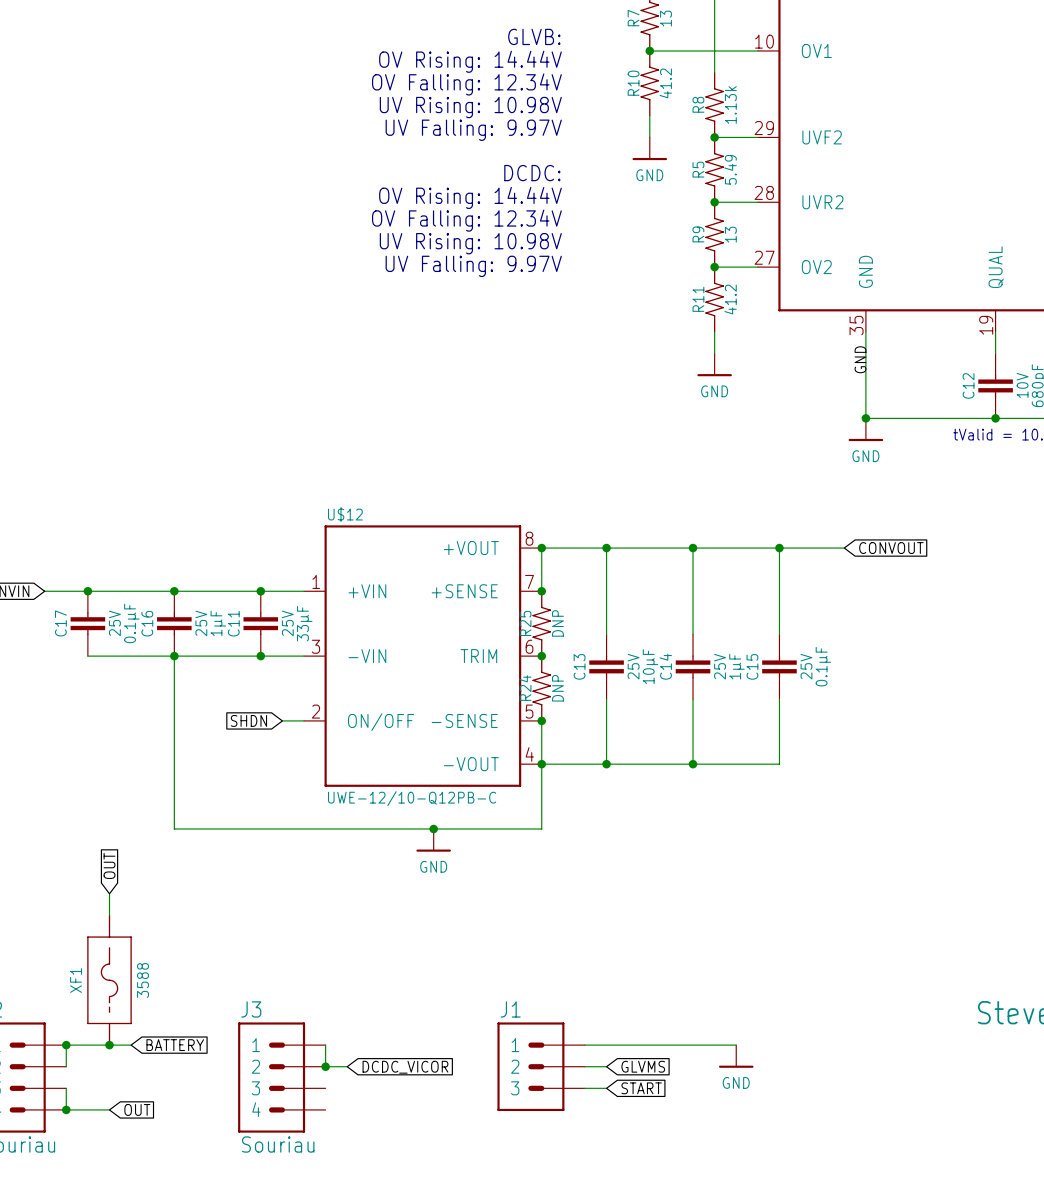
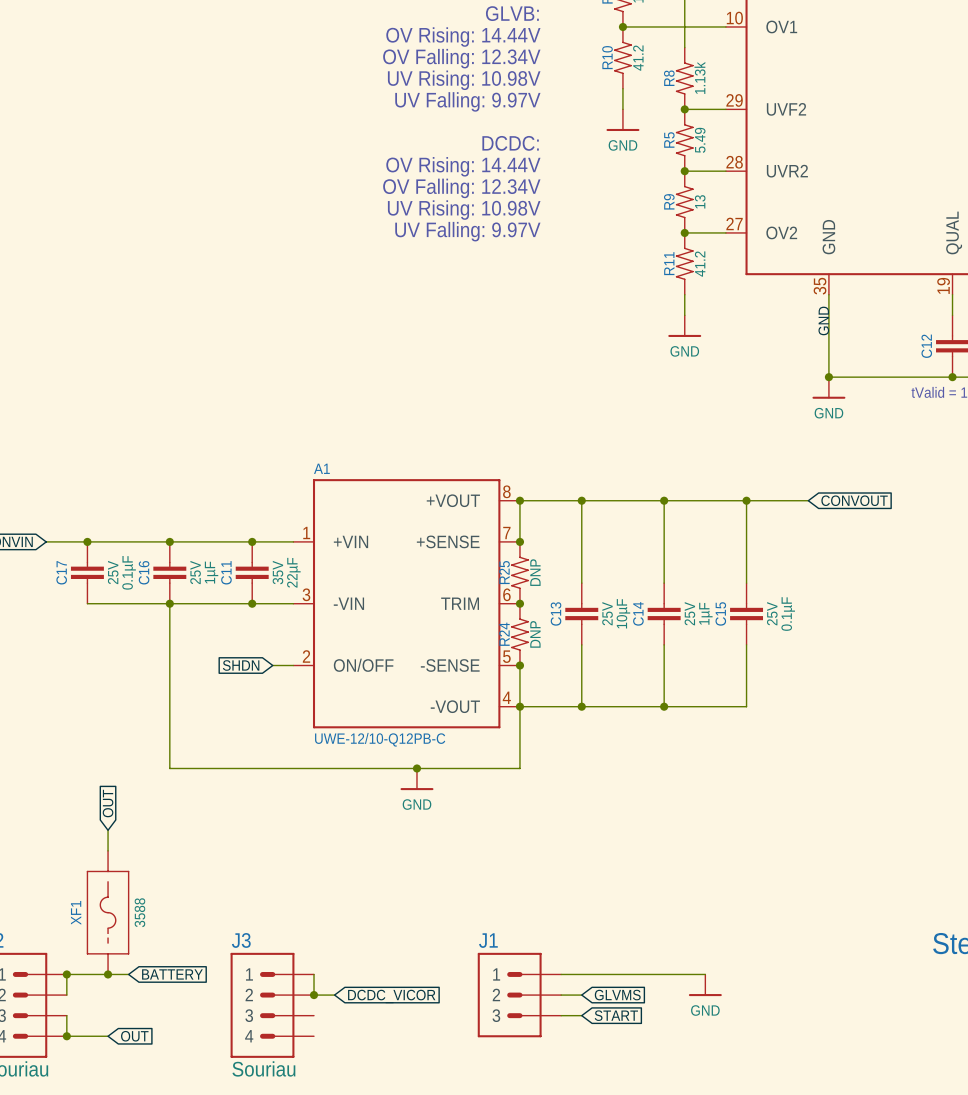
U$12 name: U$12 (345, 514) -> A1 (321, 468)
C11 text: 25V (287, 623) -> 35V (277, 572)
C11 text: 33µF (304, 623) -> 22µF (293, 572)

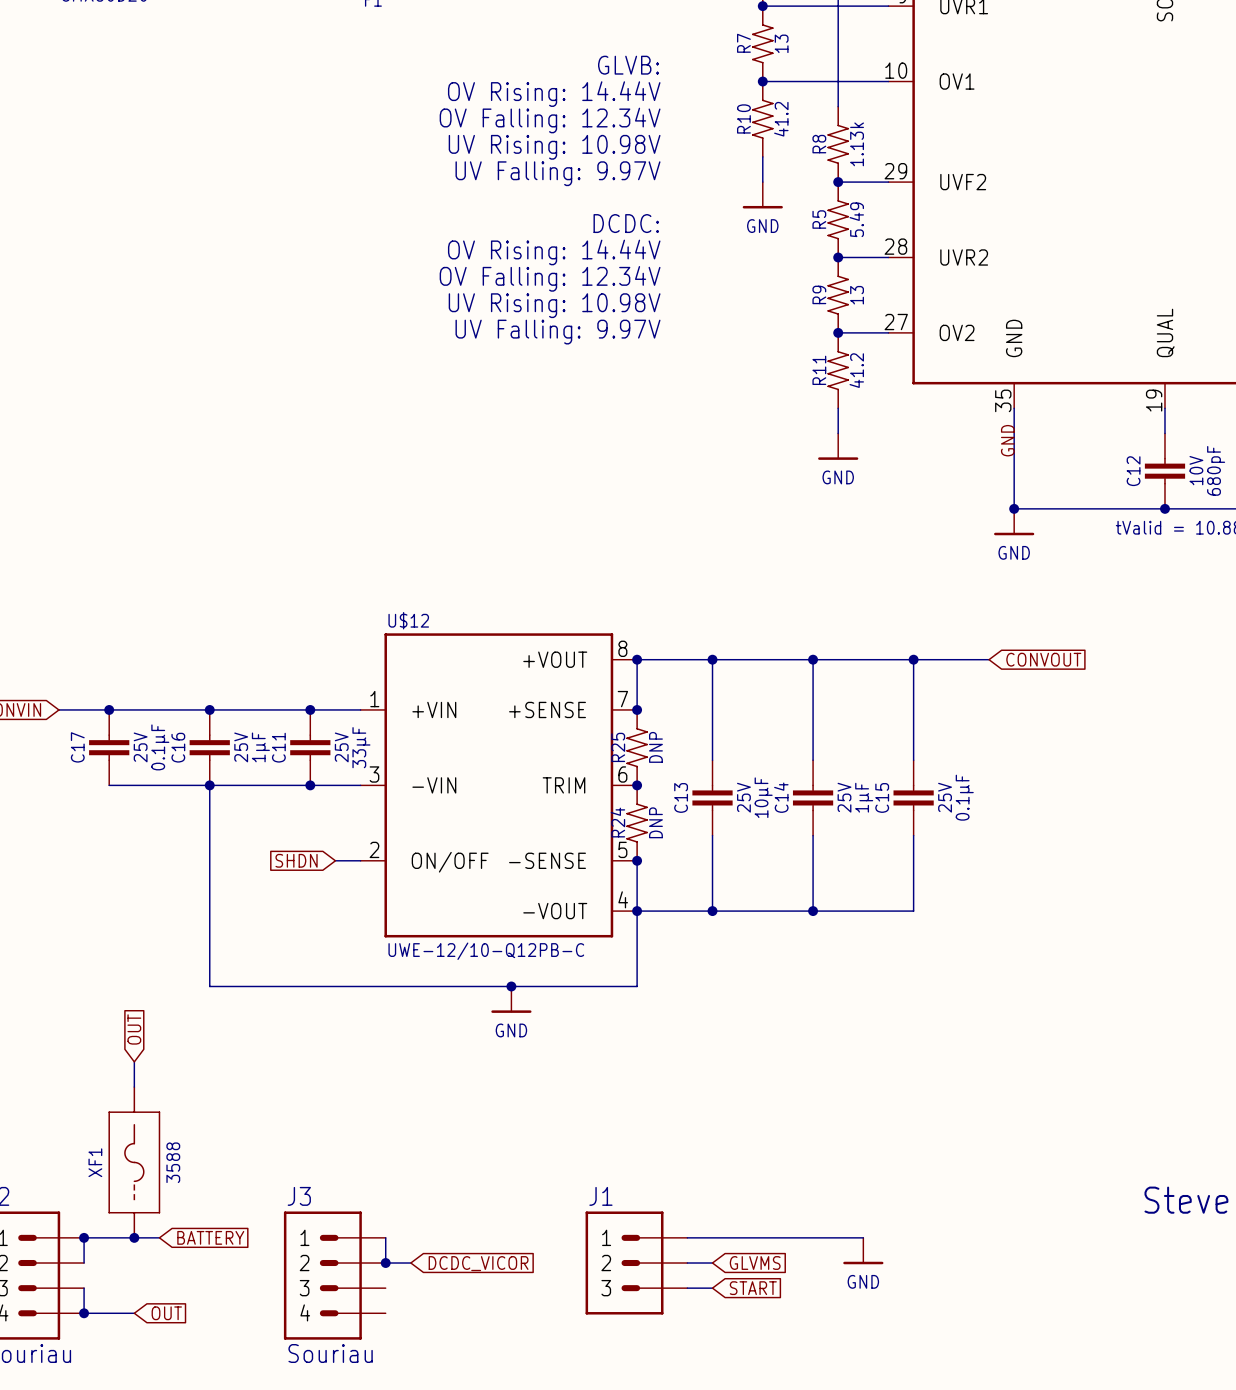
A1 name: A1 (321, 468) -> U$12 (408, 620)
C11 text: 35V (277, 572) -> 25V (341, 747)
C11 text: 22µF (293, 572) -> 33µF (361, 747)

